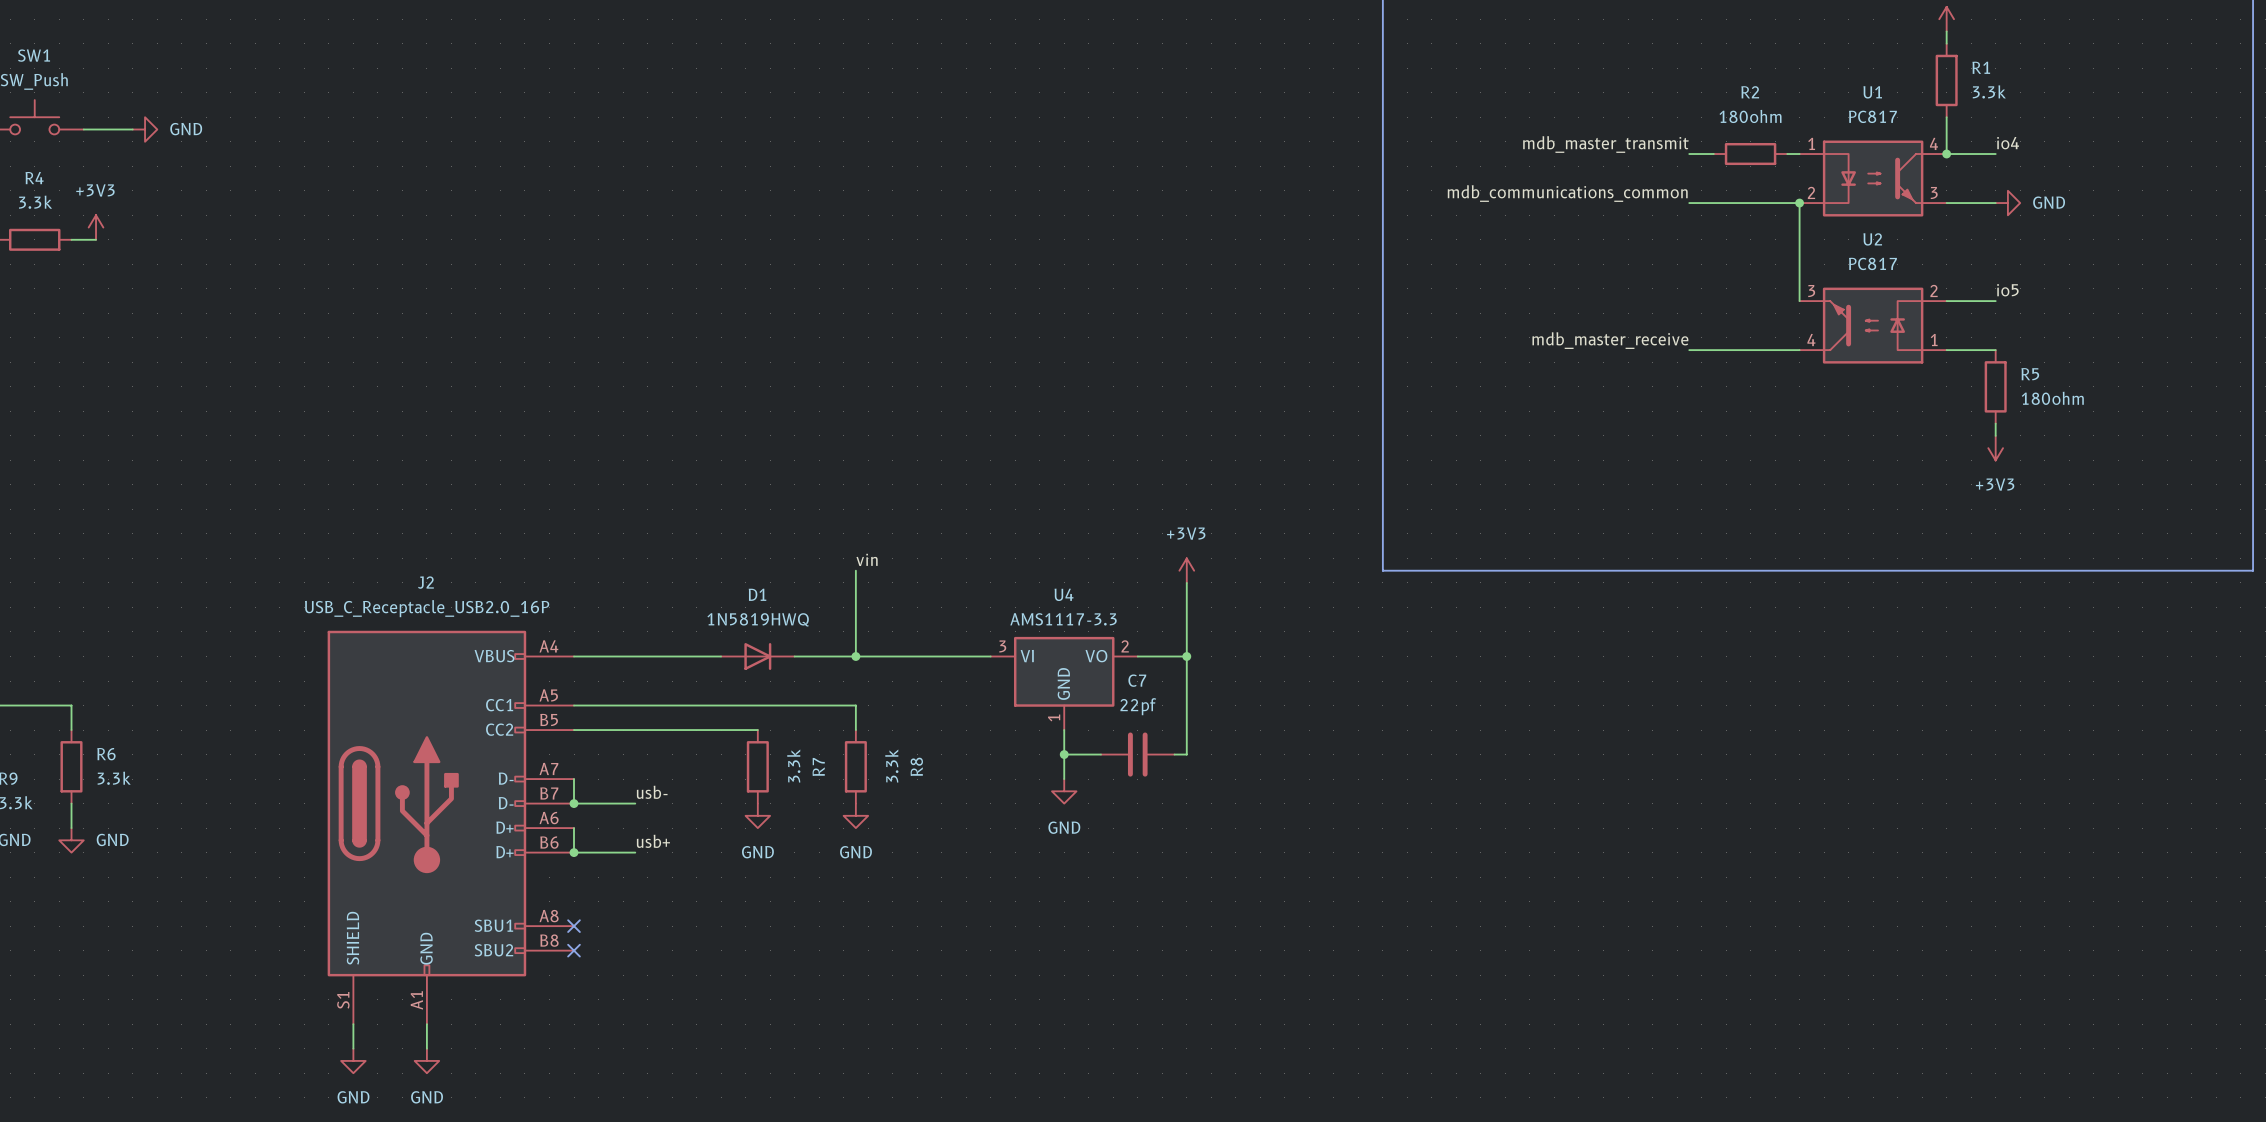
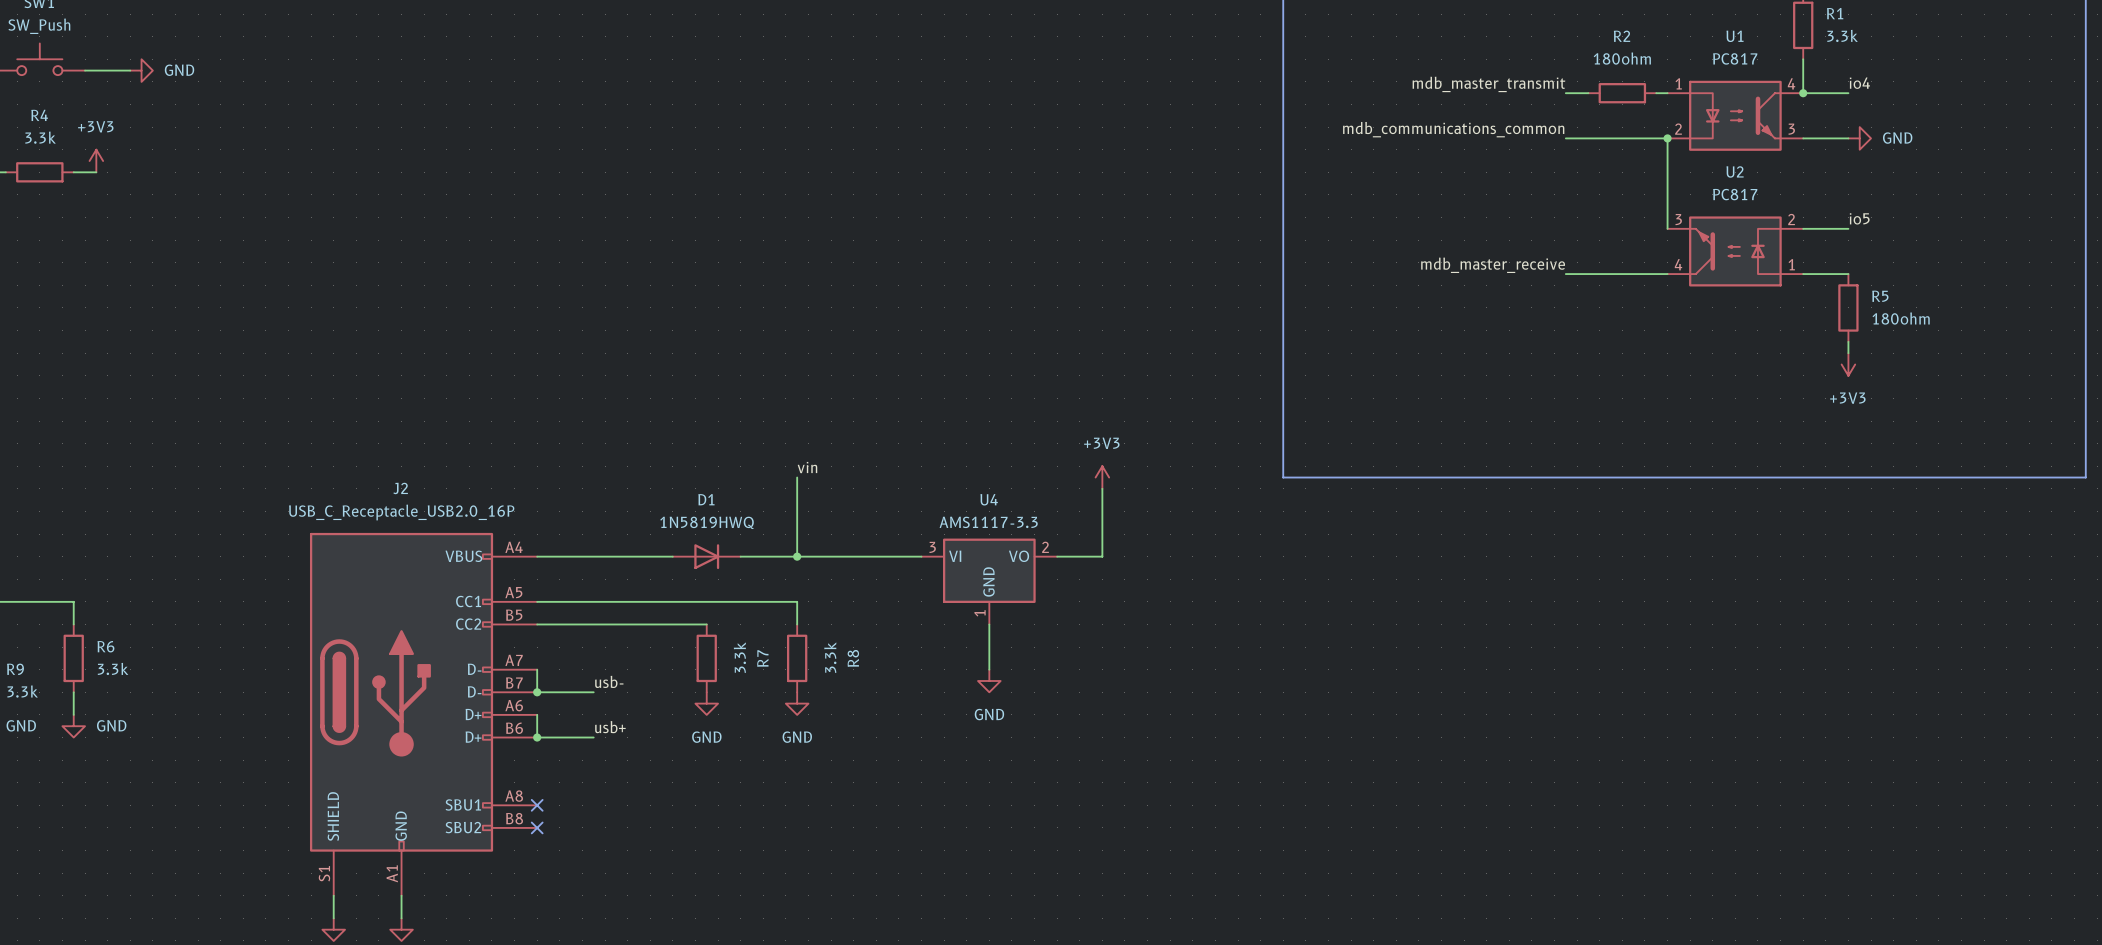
wire: (1186, 656) (1186, 754) (1174, 754) -> none
junction: (1186, 656) -> none
wire: (1064, 754) (1101, 754) -> none
junction: (1064, 754) -> none
C7: 22pf (1137, 754) -> none

